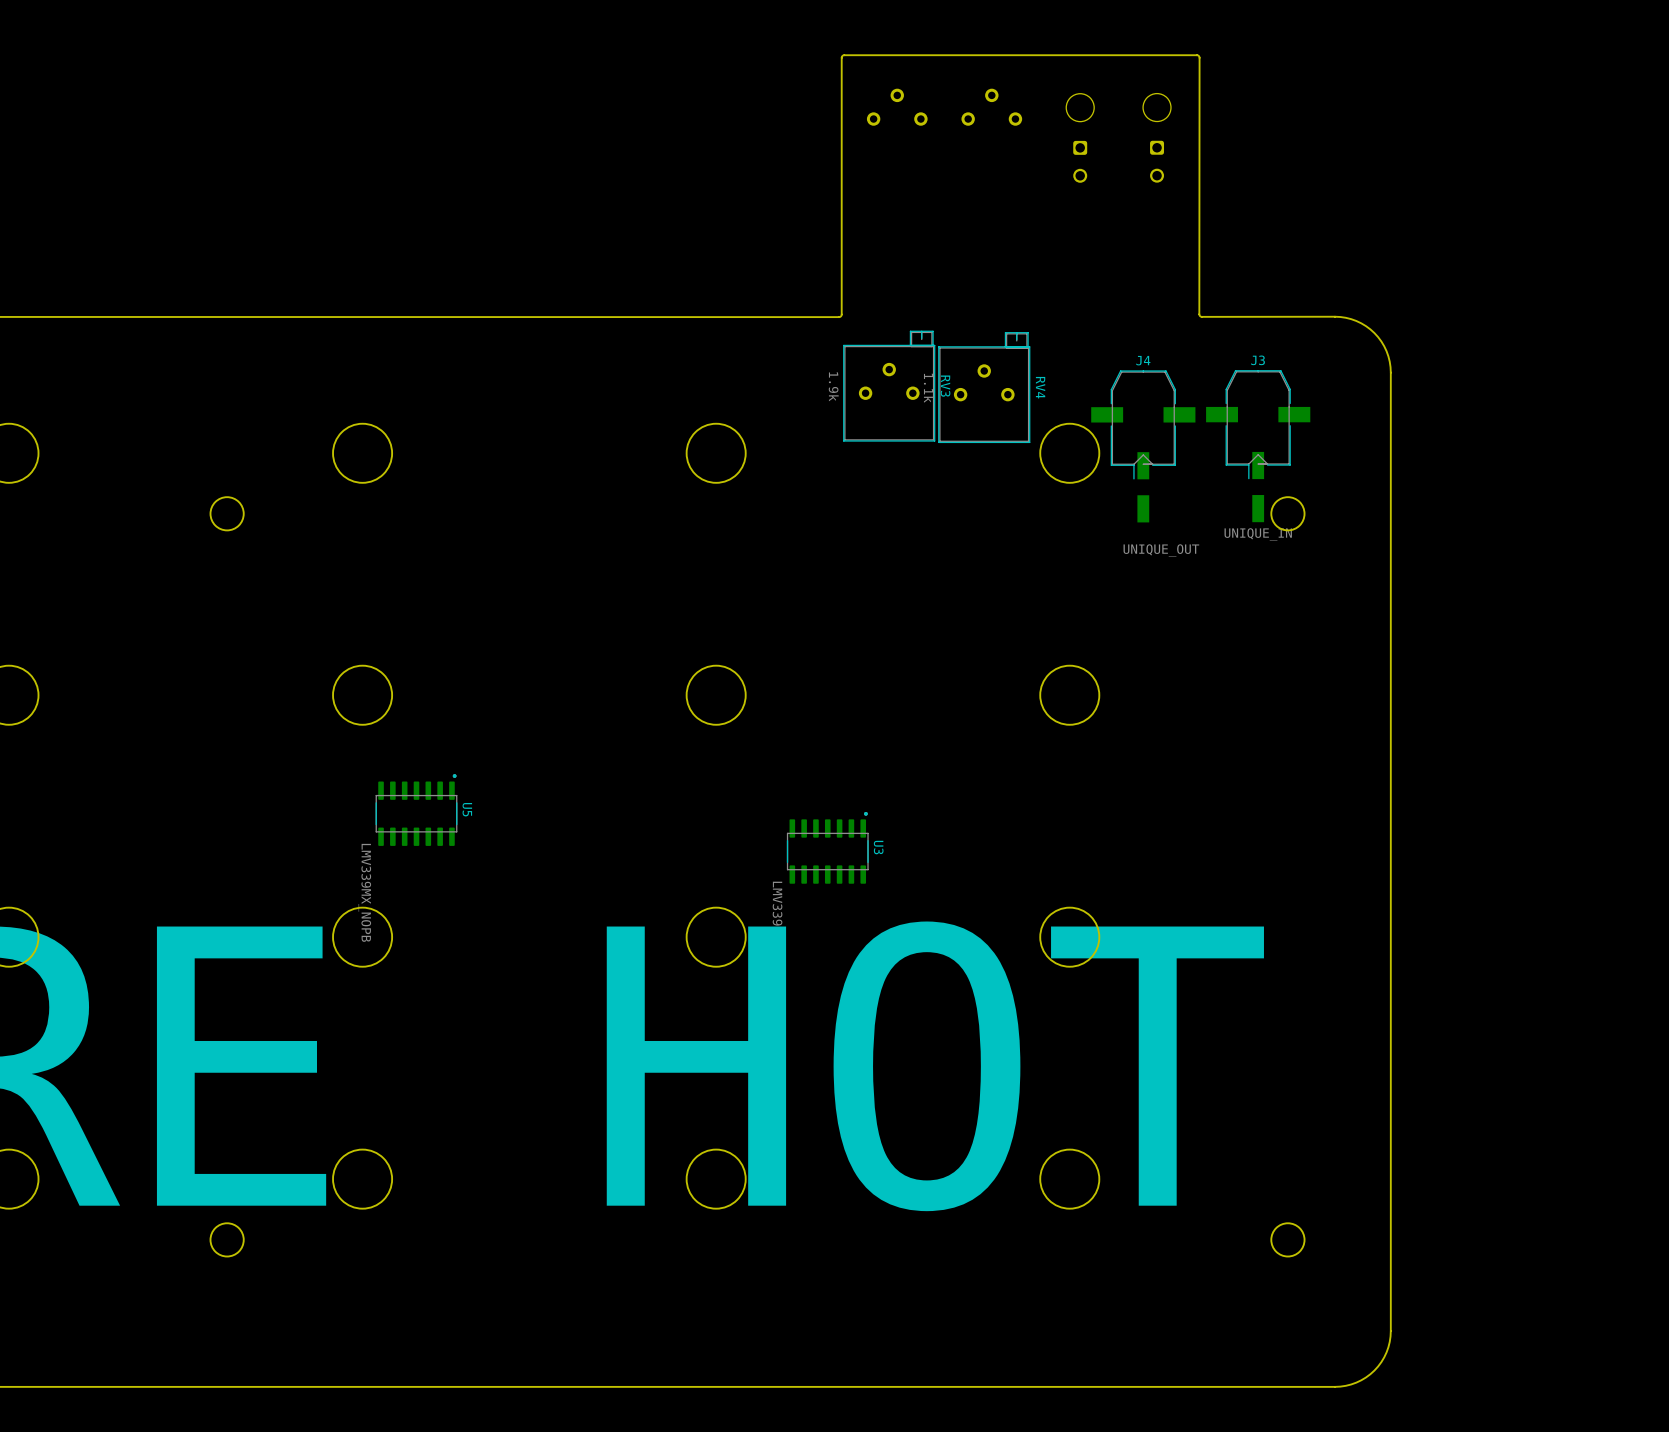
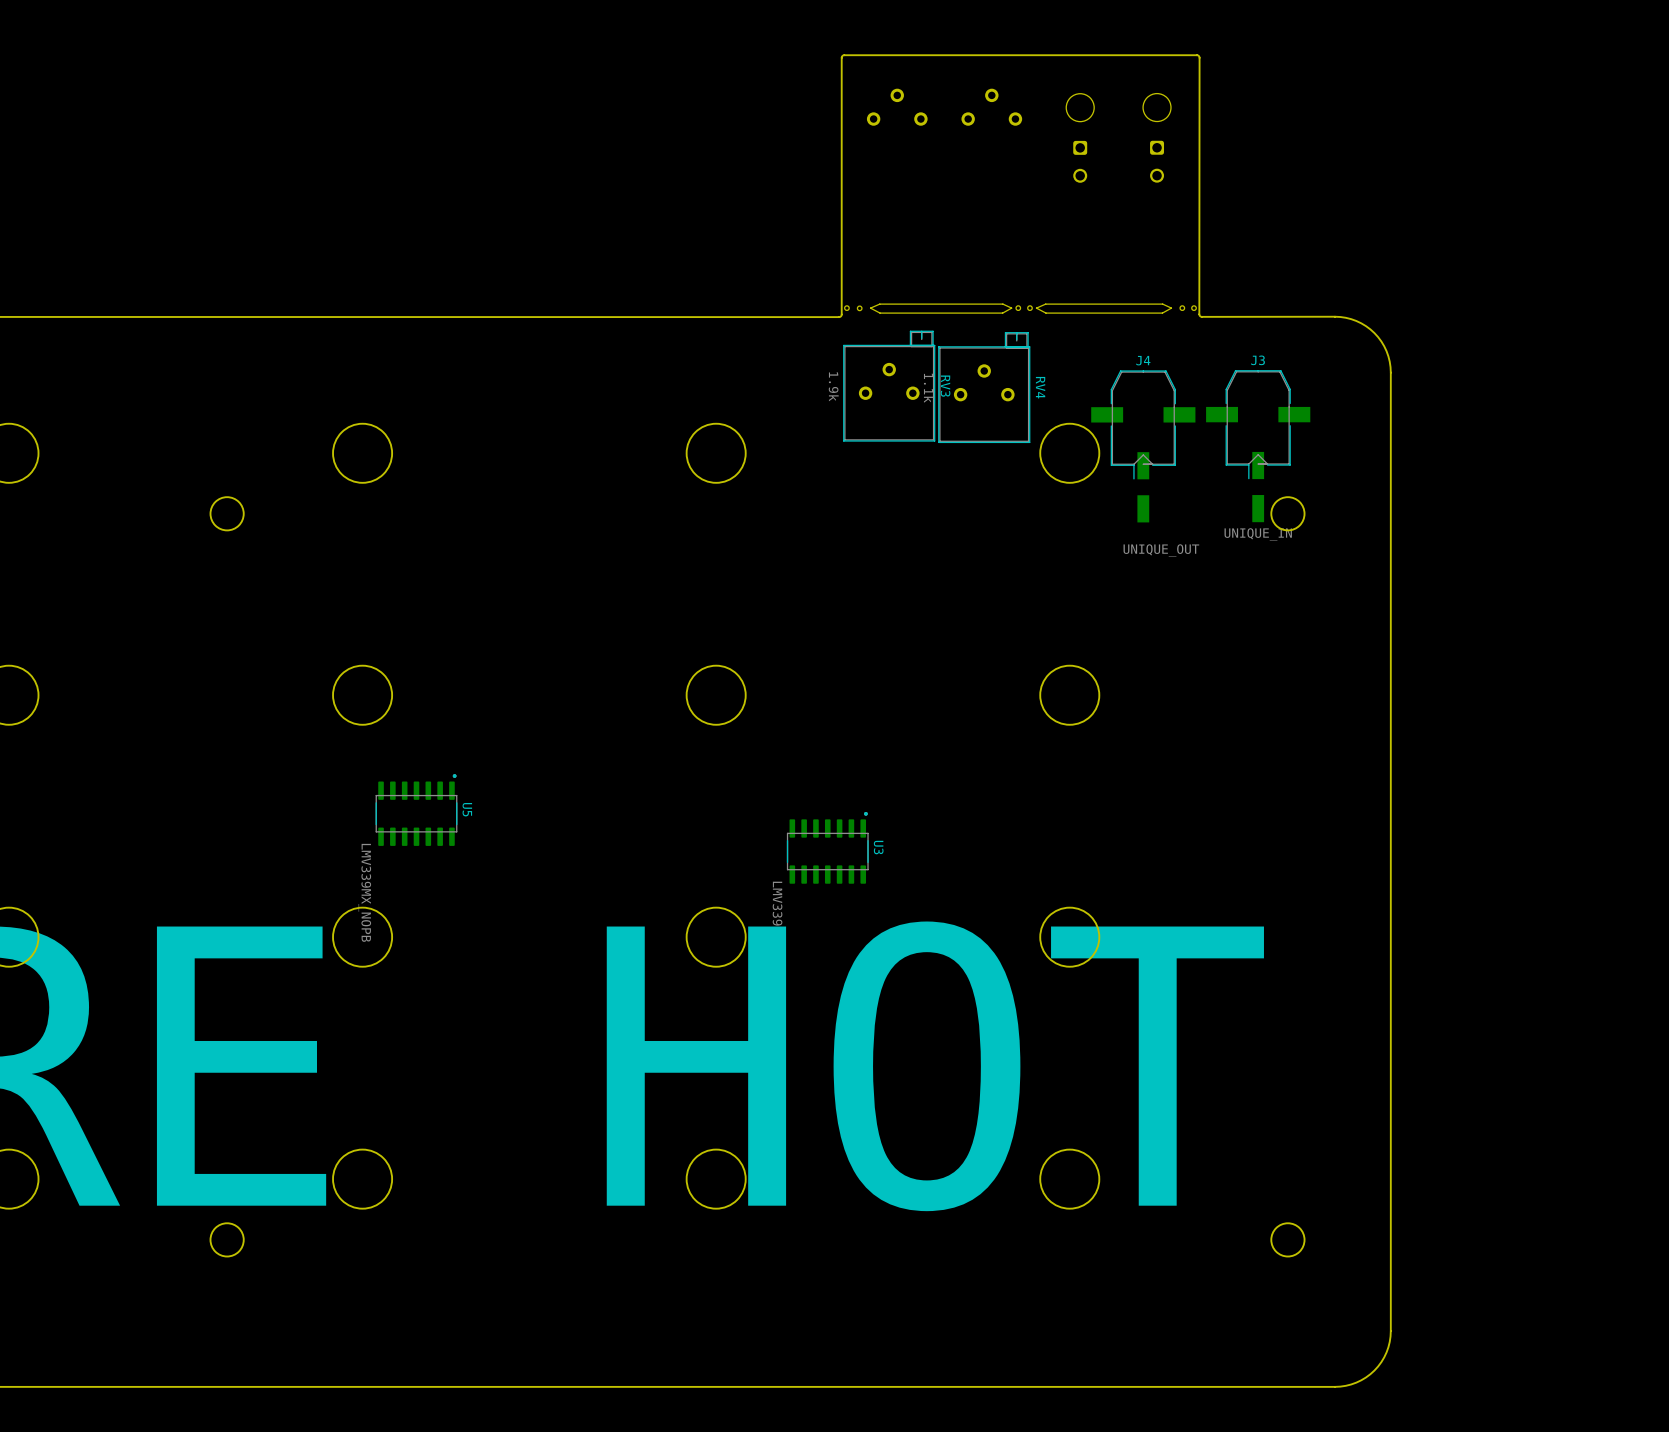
board edge: none -> (1002, 304) (879, 304) (870, 308) (880, 313) (1002, 313) (1011, 308) (1002, 304)
board edge: none -> (1162, 304) (1045, 304) (1036, 308) (1045, 313) (1162, 313) (1171, 308) (1162, 304)
round board edge: none -> [844, 305, 850, 311]
round board edge: none -> [857, 305, 863, 311]
round board edge: none -> [1015, 305, 1021, 311]
round board edge: none -> [1027, 305, 1033, 311]
round board edge: none -> [1179, 305, 1185, 311]
round board edge: none -> [1191, 305, 1197, 311]

